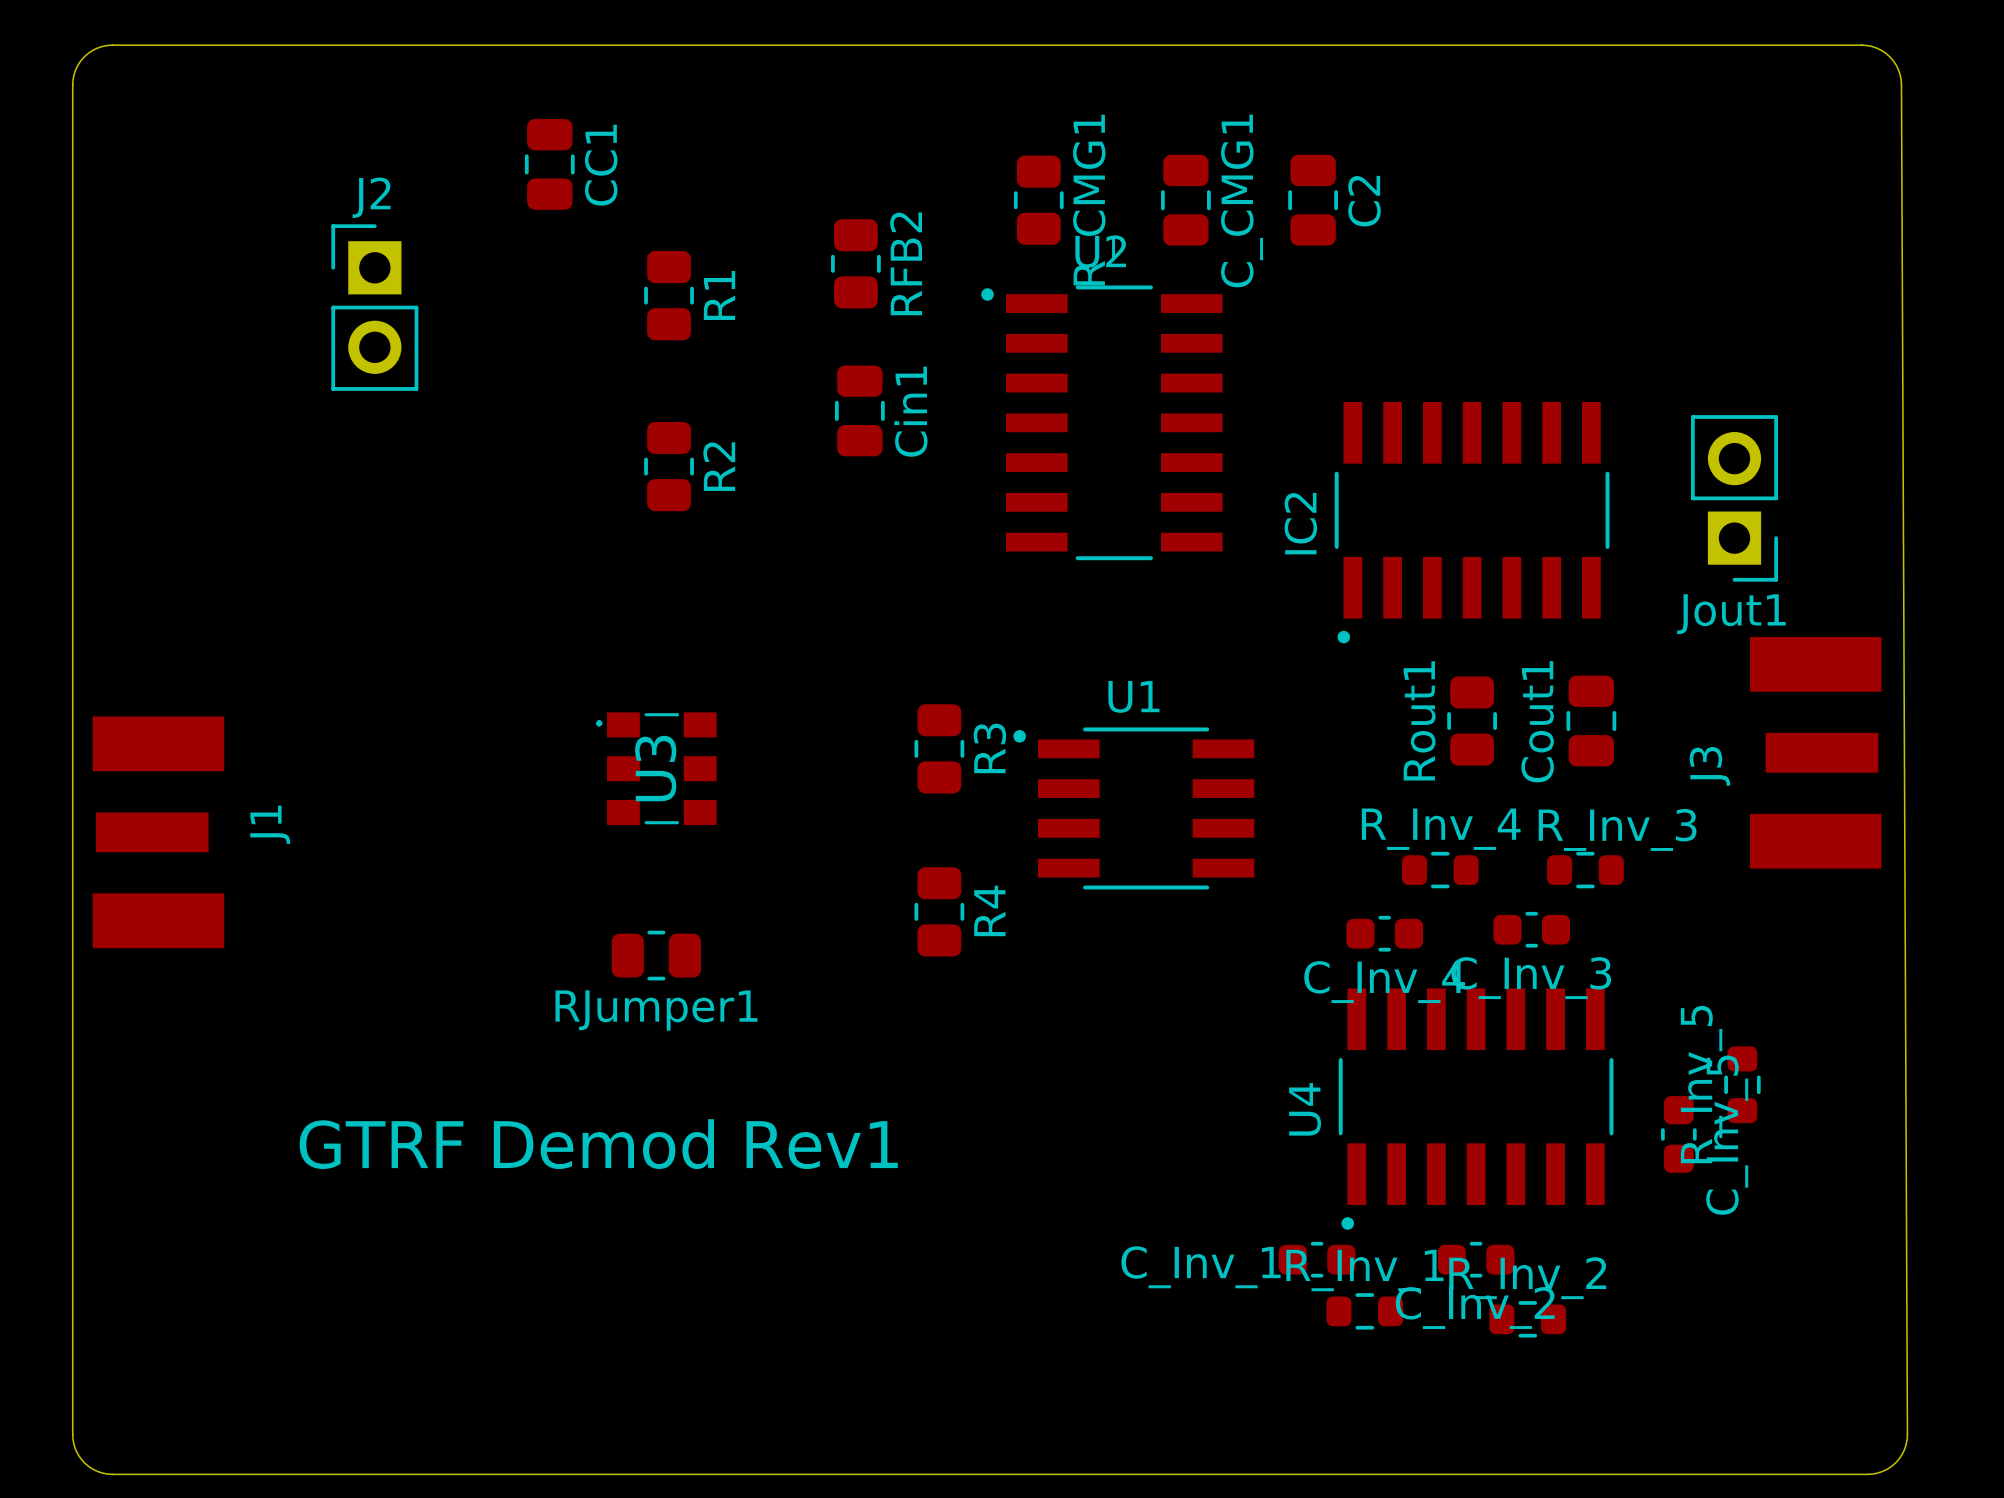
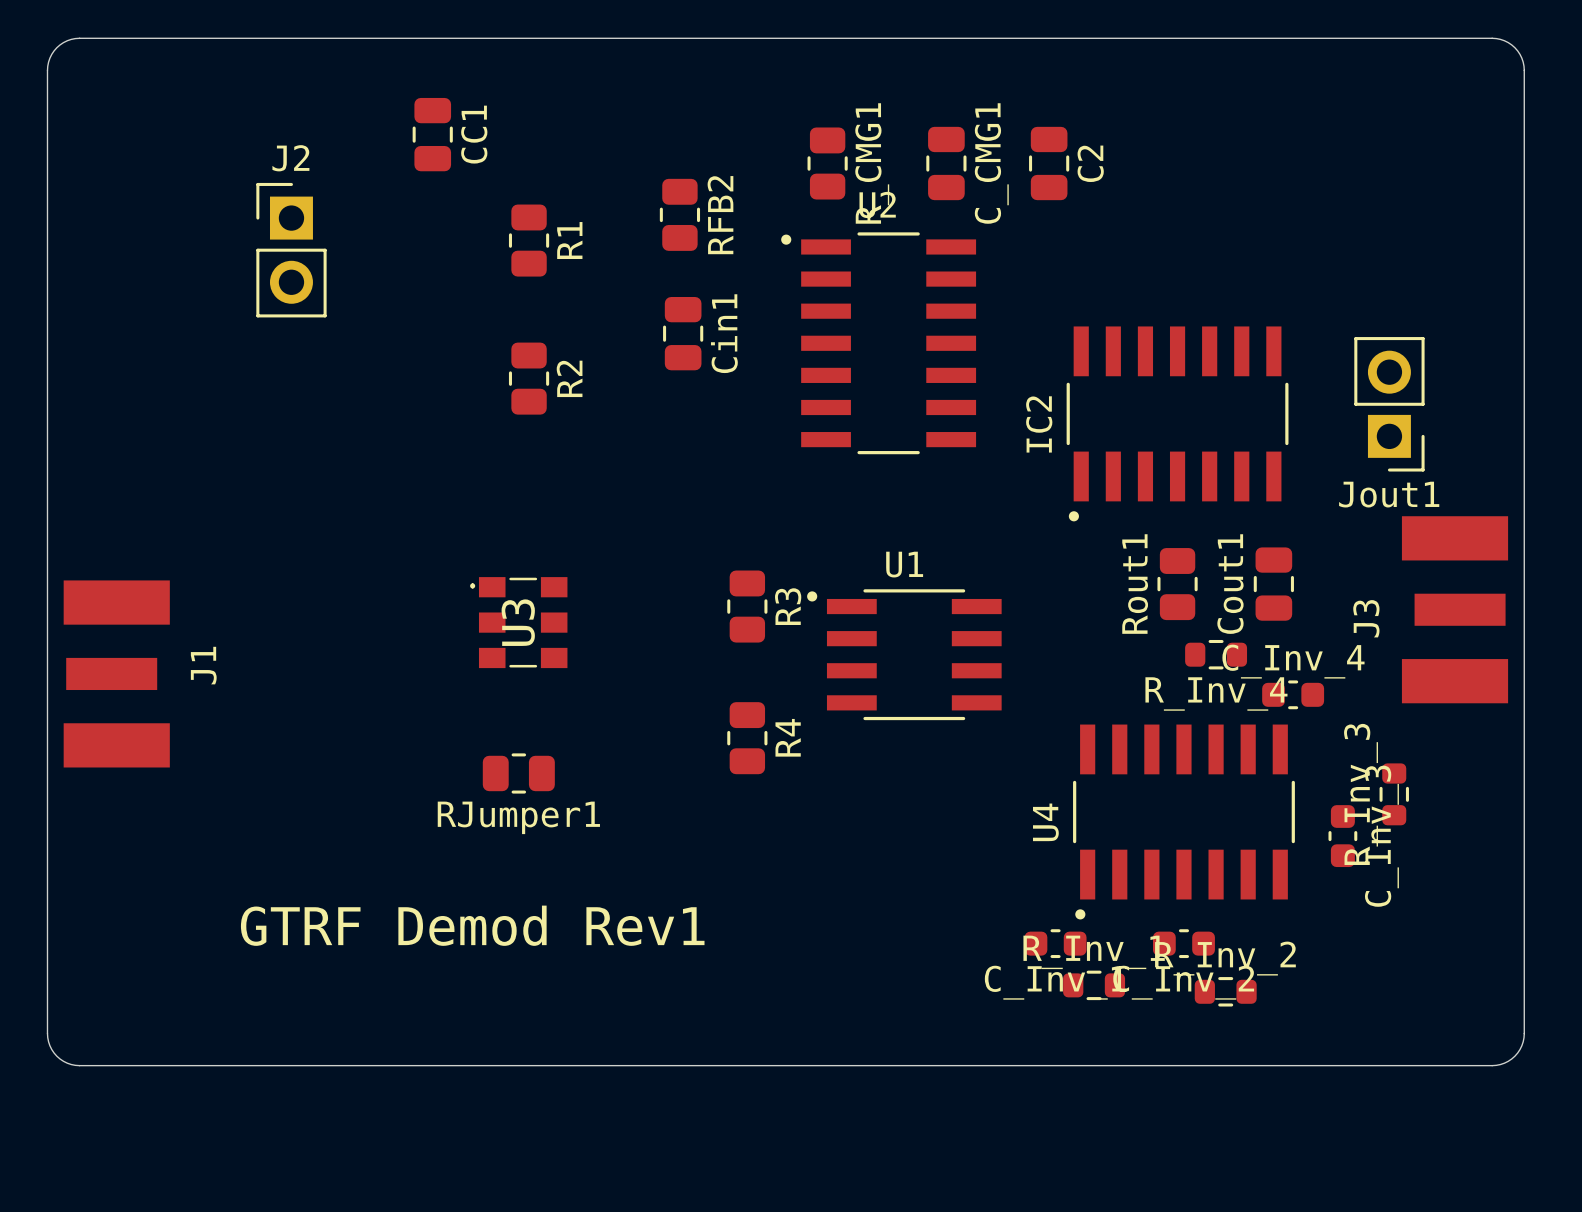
board edge: (1901, 84) (1907, 1434) (1902, 1454) (1887, 1469) (1867, 1474) (107, 1474) (92, 1469) (84, 1462) (78, 1454) (73, 1439) (72, 1277) -> (1524, 70) (1524, 1033) (1519, 1049) (1508, 1061) (1492, 1065) (79, 1065) (67, 1063) (56, 1056) (49, 1045) (47, 1033)
R_Inv_4 name position: R_Inv_4 (1441, 829) -> R_Inv_4 (1216, 693)
R_Inv_3 name position: R_Inv_3 (1617, 829) -> R_Inv_3 (1361, 794)
R_Inv_4 position: (1440, 870) -> (1216, 654)
R_Inv_3 rotation: 0° (1585, 870) -> 90° clockwise (1394, 794)
R_Inv_3 position: (1585, 870) -> (1394, 794)
C_Inv_3 rotation: 0° (1531, 929) -> 90° clockwise (1342, 836)
C_Inv_3 position: (1531, 929) -> (1342, 836)
C_Inv_4 position: (1384, 933) -> (1293, 694)
C_Inv_3 name position: C_Inv_3 (1531, 978) -> C_Inv_3 (1381, 836)
C_Inv_4 name position: C_Inv_4 (1384, 982) -> C_Inv_4 (1293, 661)
R_Inv_5: (1742, 1084) -> none
U4 position: (1476, 1109) -> (1183, 821)
C_Inv_5: (1678, 1134) -> none
C_Inv_1 position: (1317, 1259) -> (1055, 943)
C_Inv_2 position: (1476, 1259) -> (1183, 943)
C_Inv_1 name position: C_Inv_1 (1201, 1267) -> C_Inv_1 (1055, 982)
R_Inv_1 position: (1364, 1311) -> (1094, 985)
R_Inv_2 position: (1527, 1319) -> (1225, 991)

